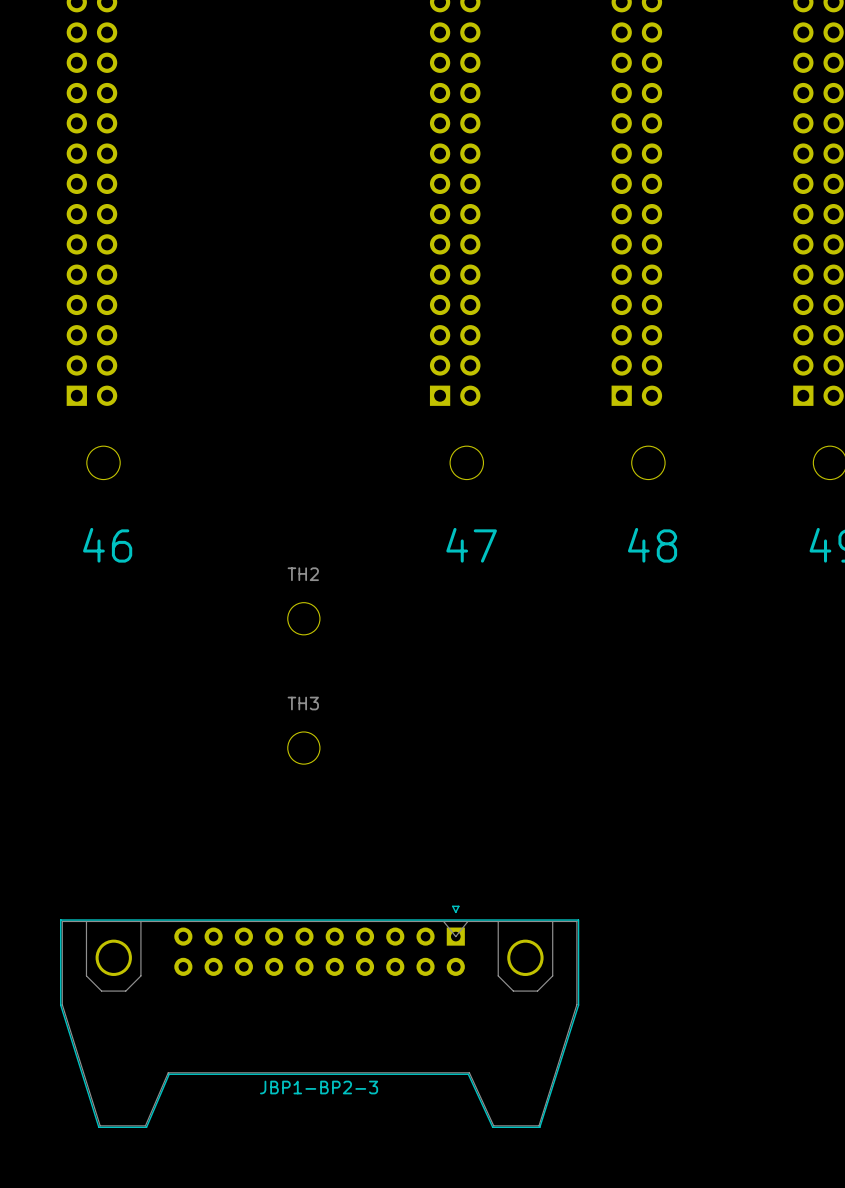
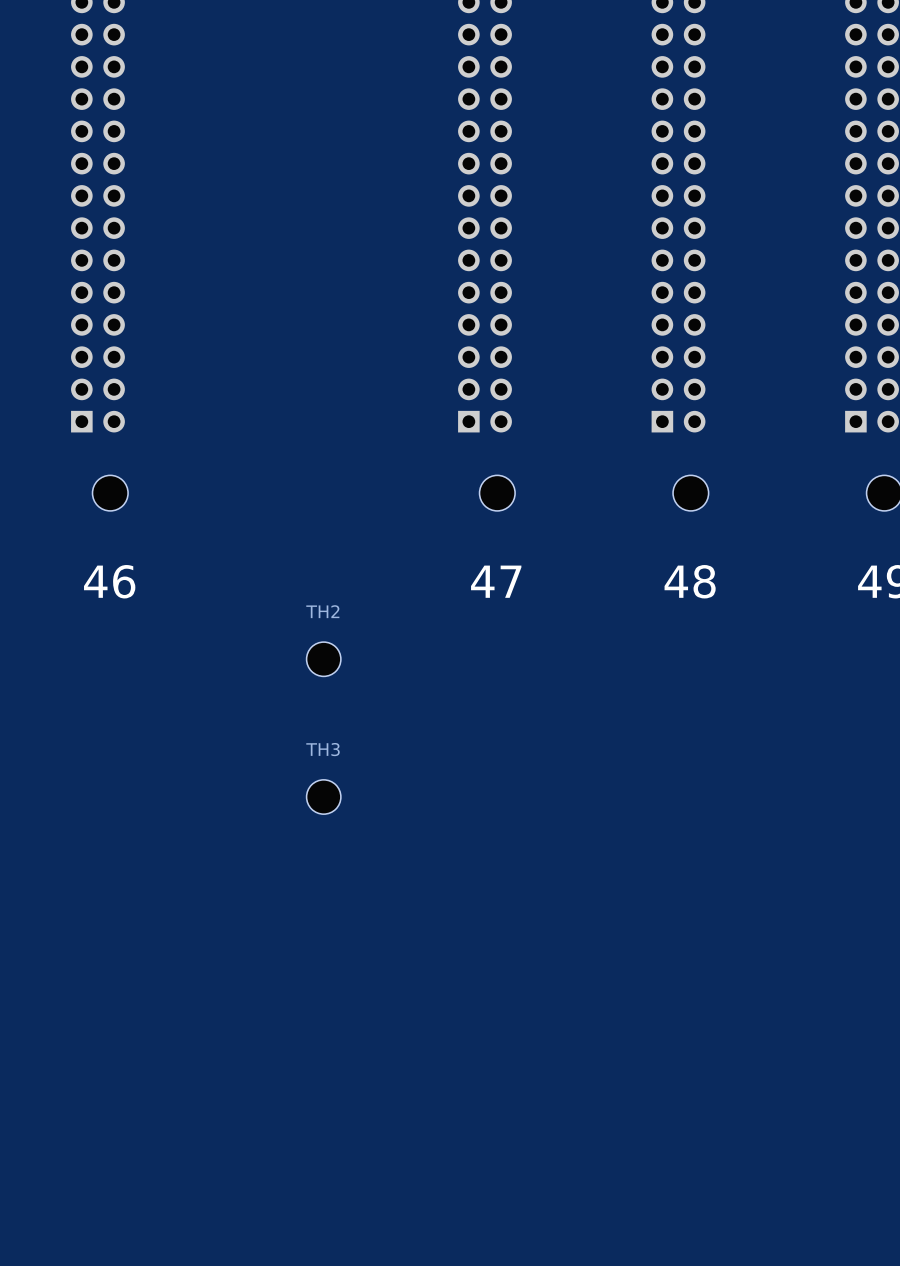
JBP1-BP2-3: (319, 1016) -> none

